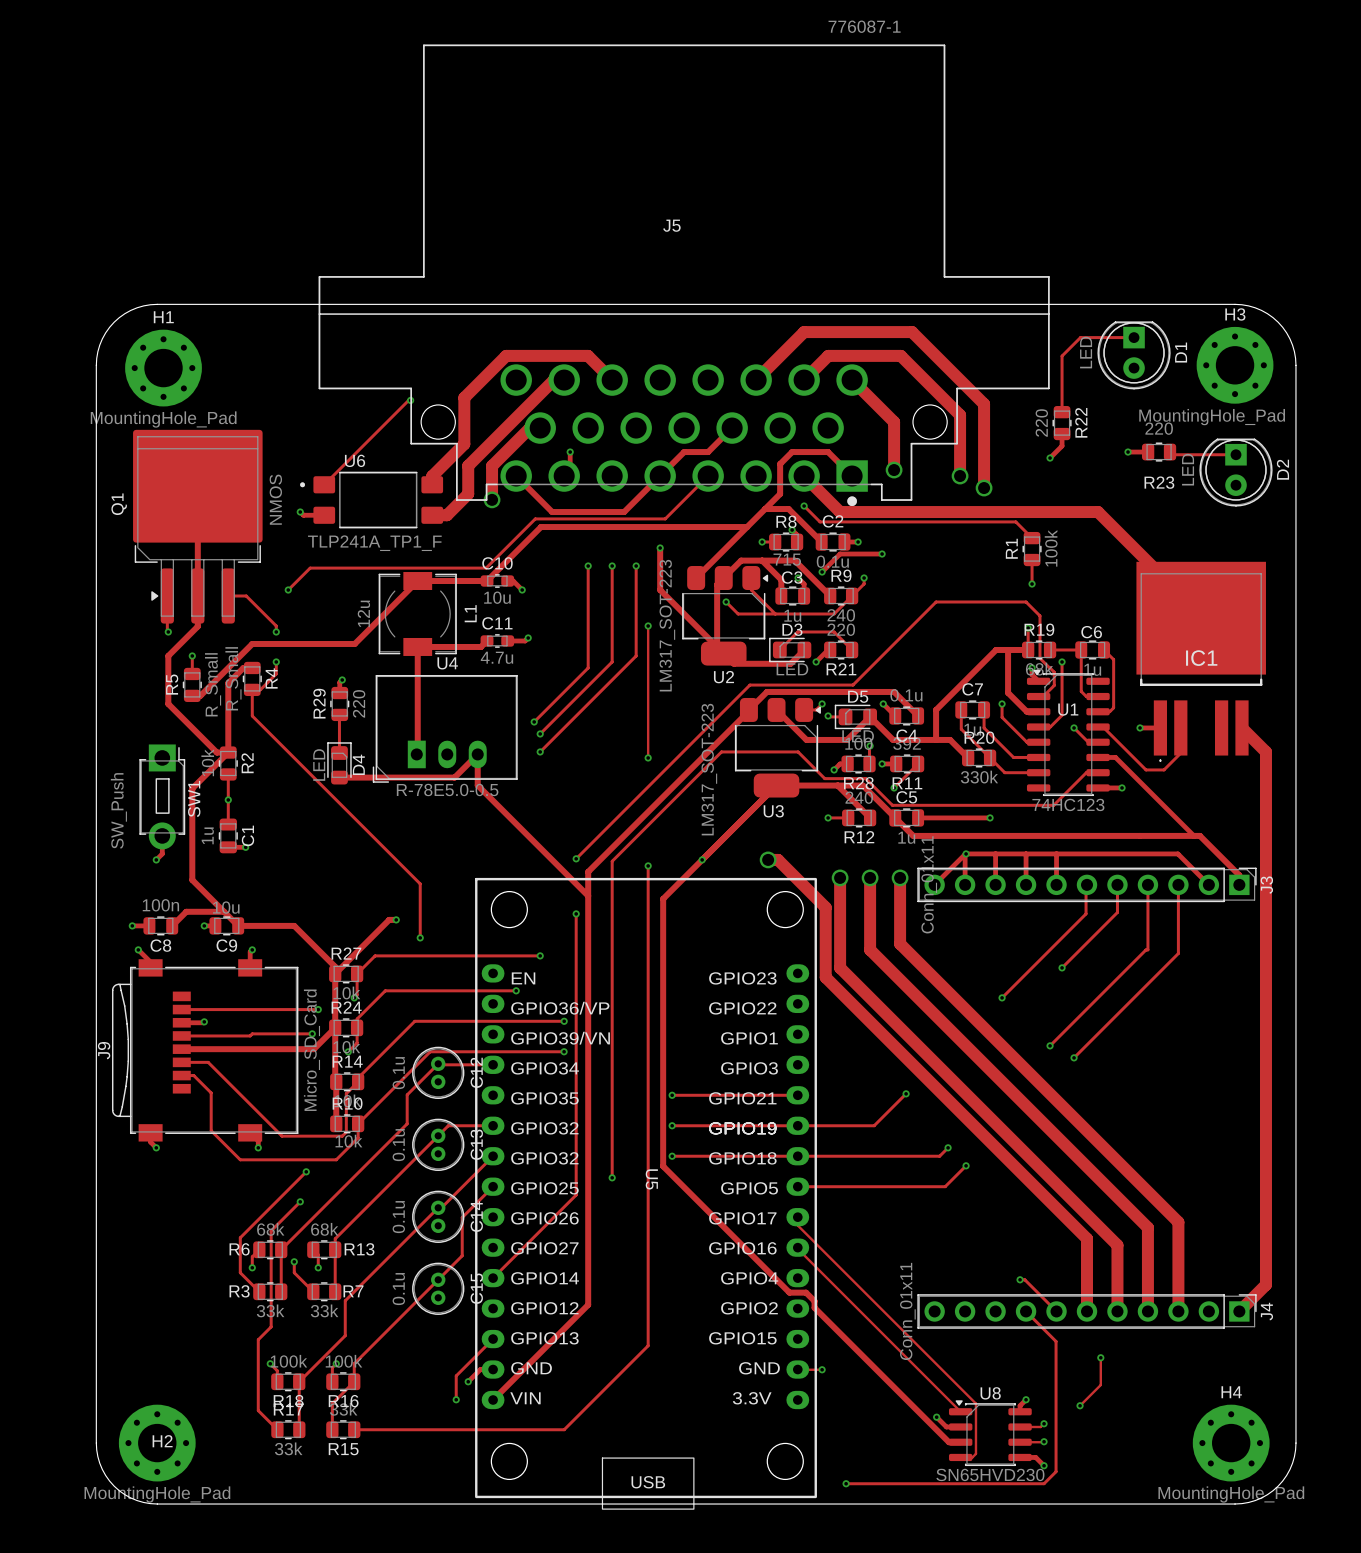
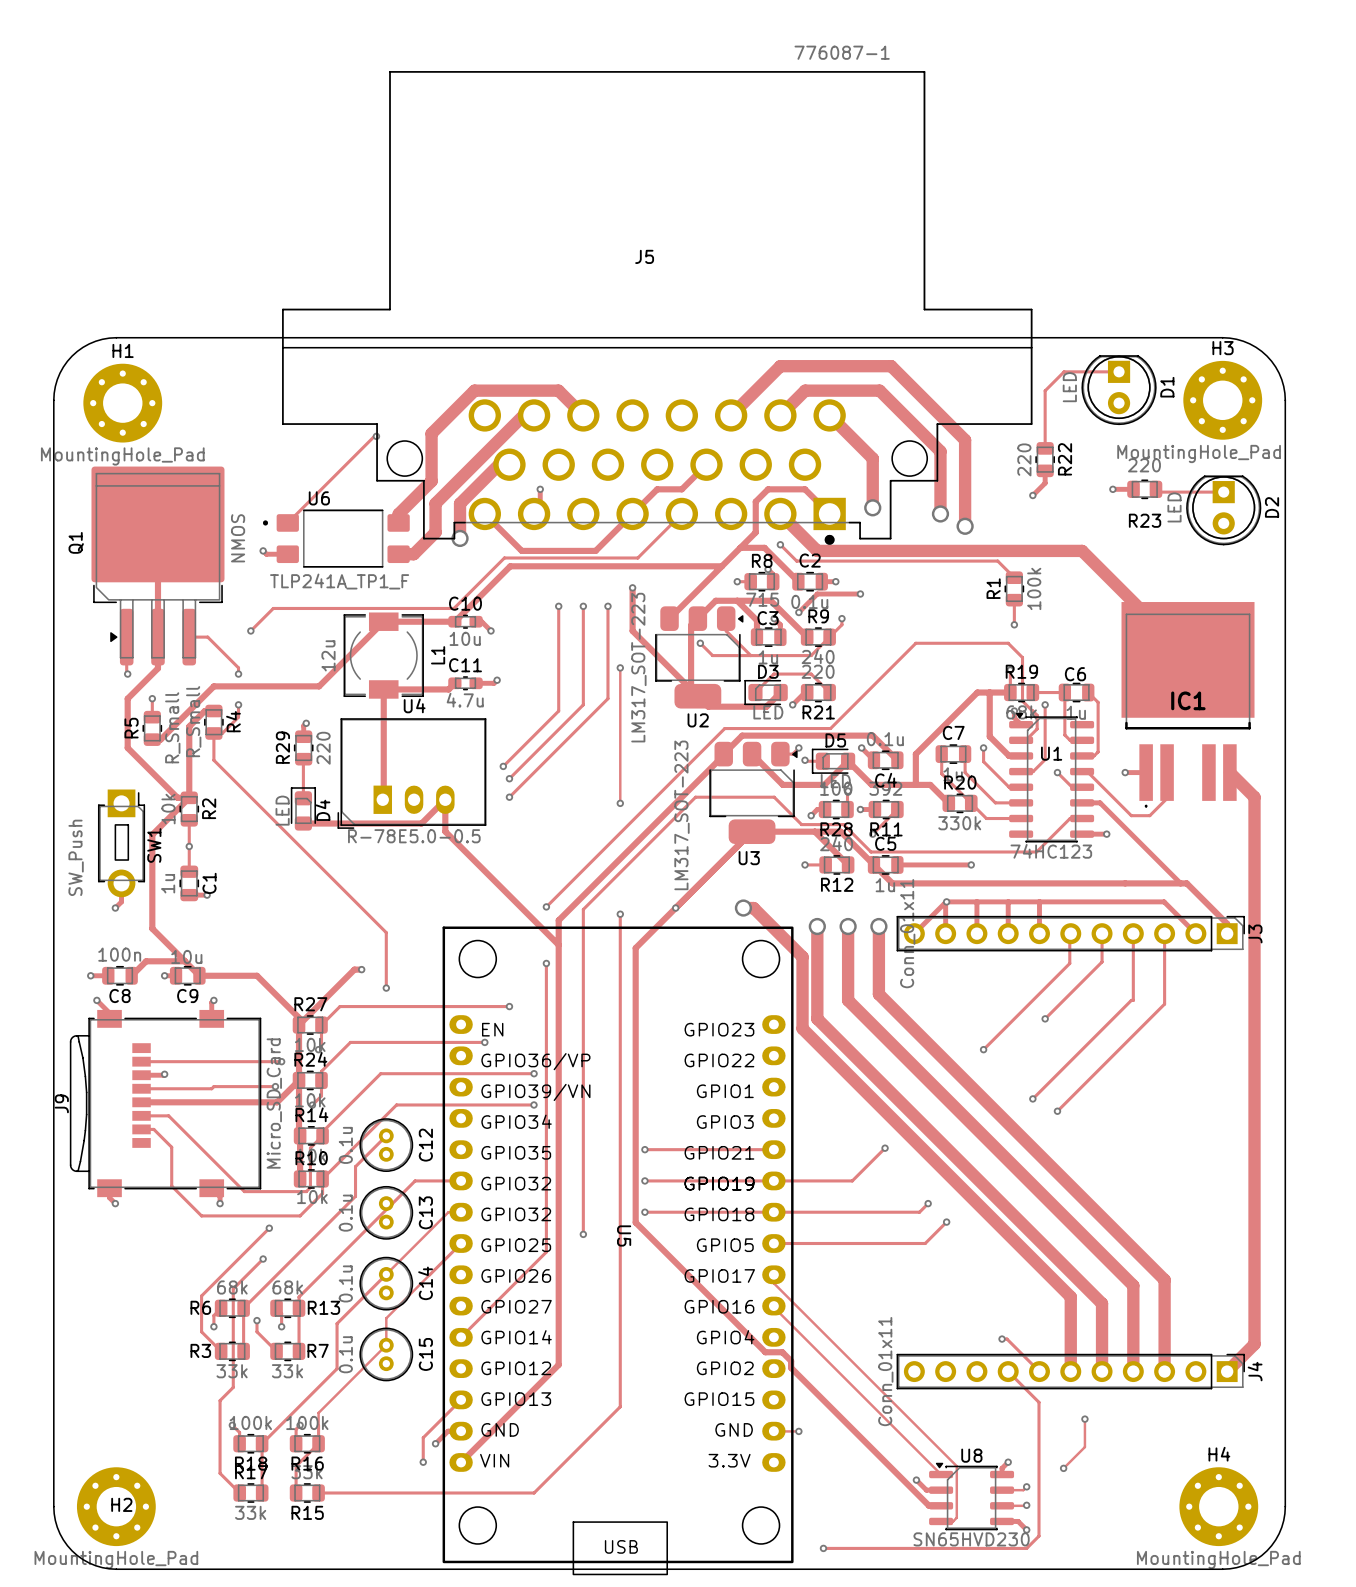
track: (493, 1064) (438, 1063) (420, 1081) -> none
C12 position: (438, 1072) -> (386, 1145)
track: (407, 1094) (407, 1123) (390, 1140) -> (372, 1149) (355, 1166) (355, 1196)
C13 position: (438, 1144) -> (386, 1212)
track: (493, 1156) (345, 1300) (345, 1335) -> (461, 1212) (448, 1212) (337, 1323) (337, 1368) (309, 1396)
C14 position: (438, 1216) -> (386, 1283)
track: (462, 1217) (462, 1255) (354, 1363) -> (429, 1275) (386, 1318) (386, 1345) (318, 1412) (318, 1425)
C15 position: (438, 1288) -> (386, 1354)

